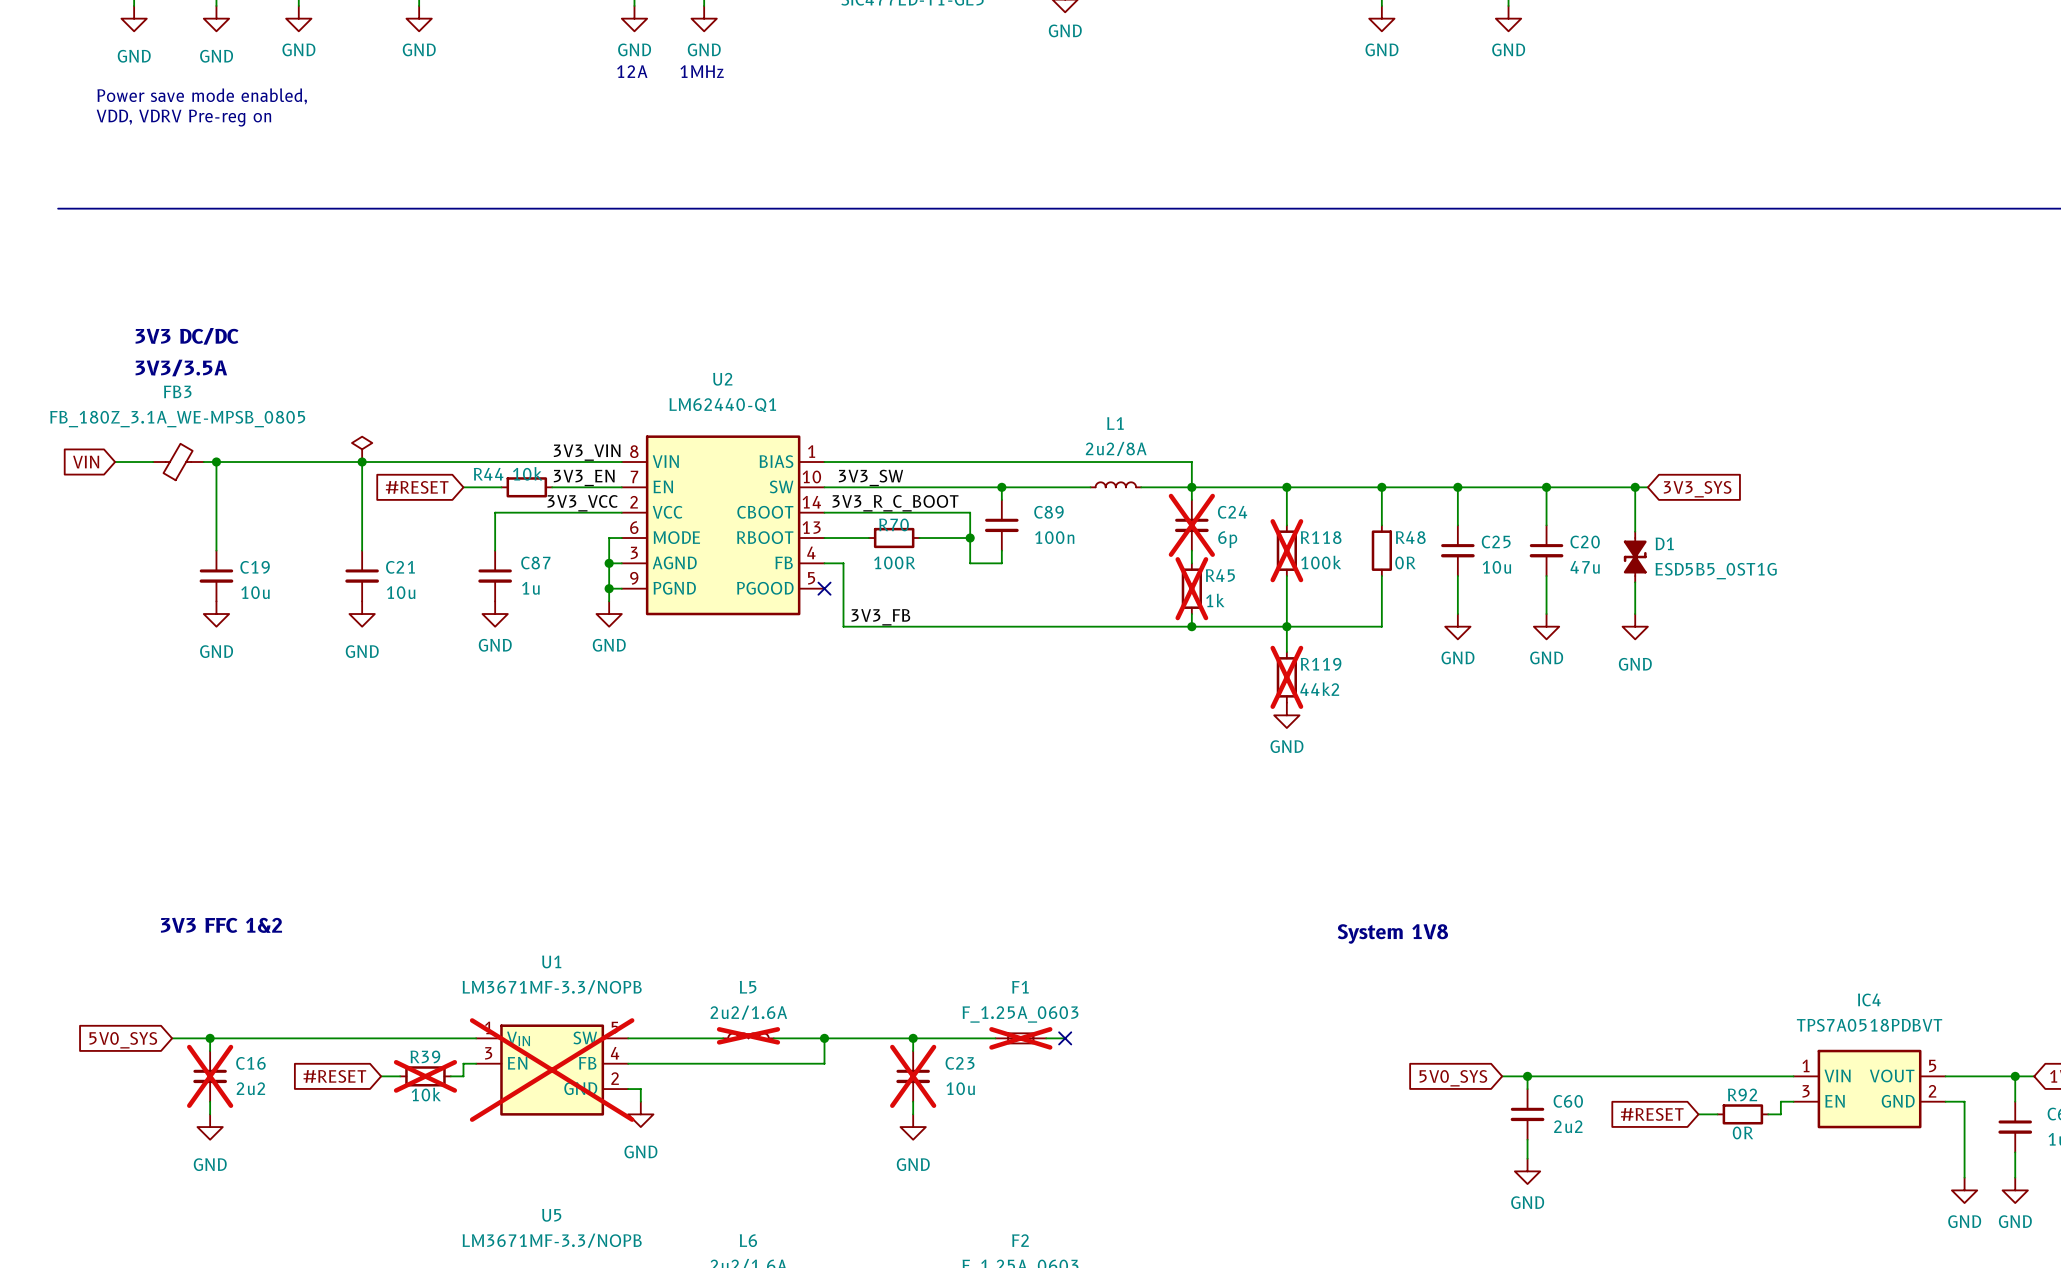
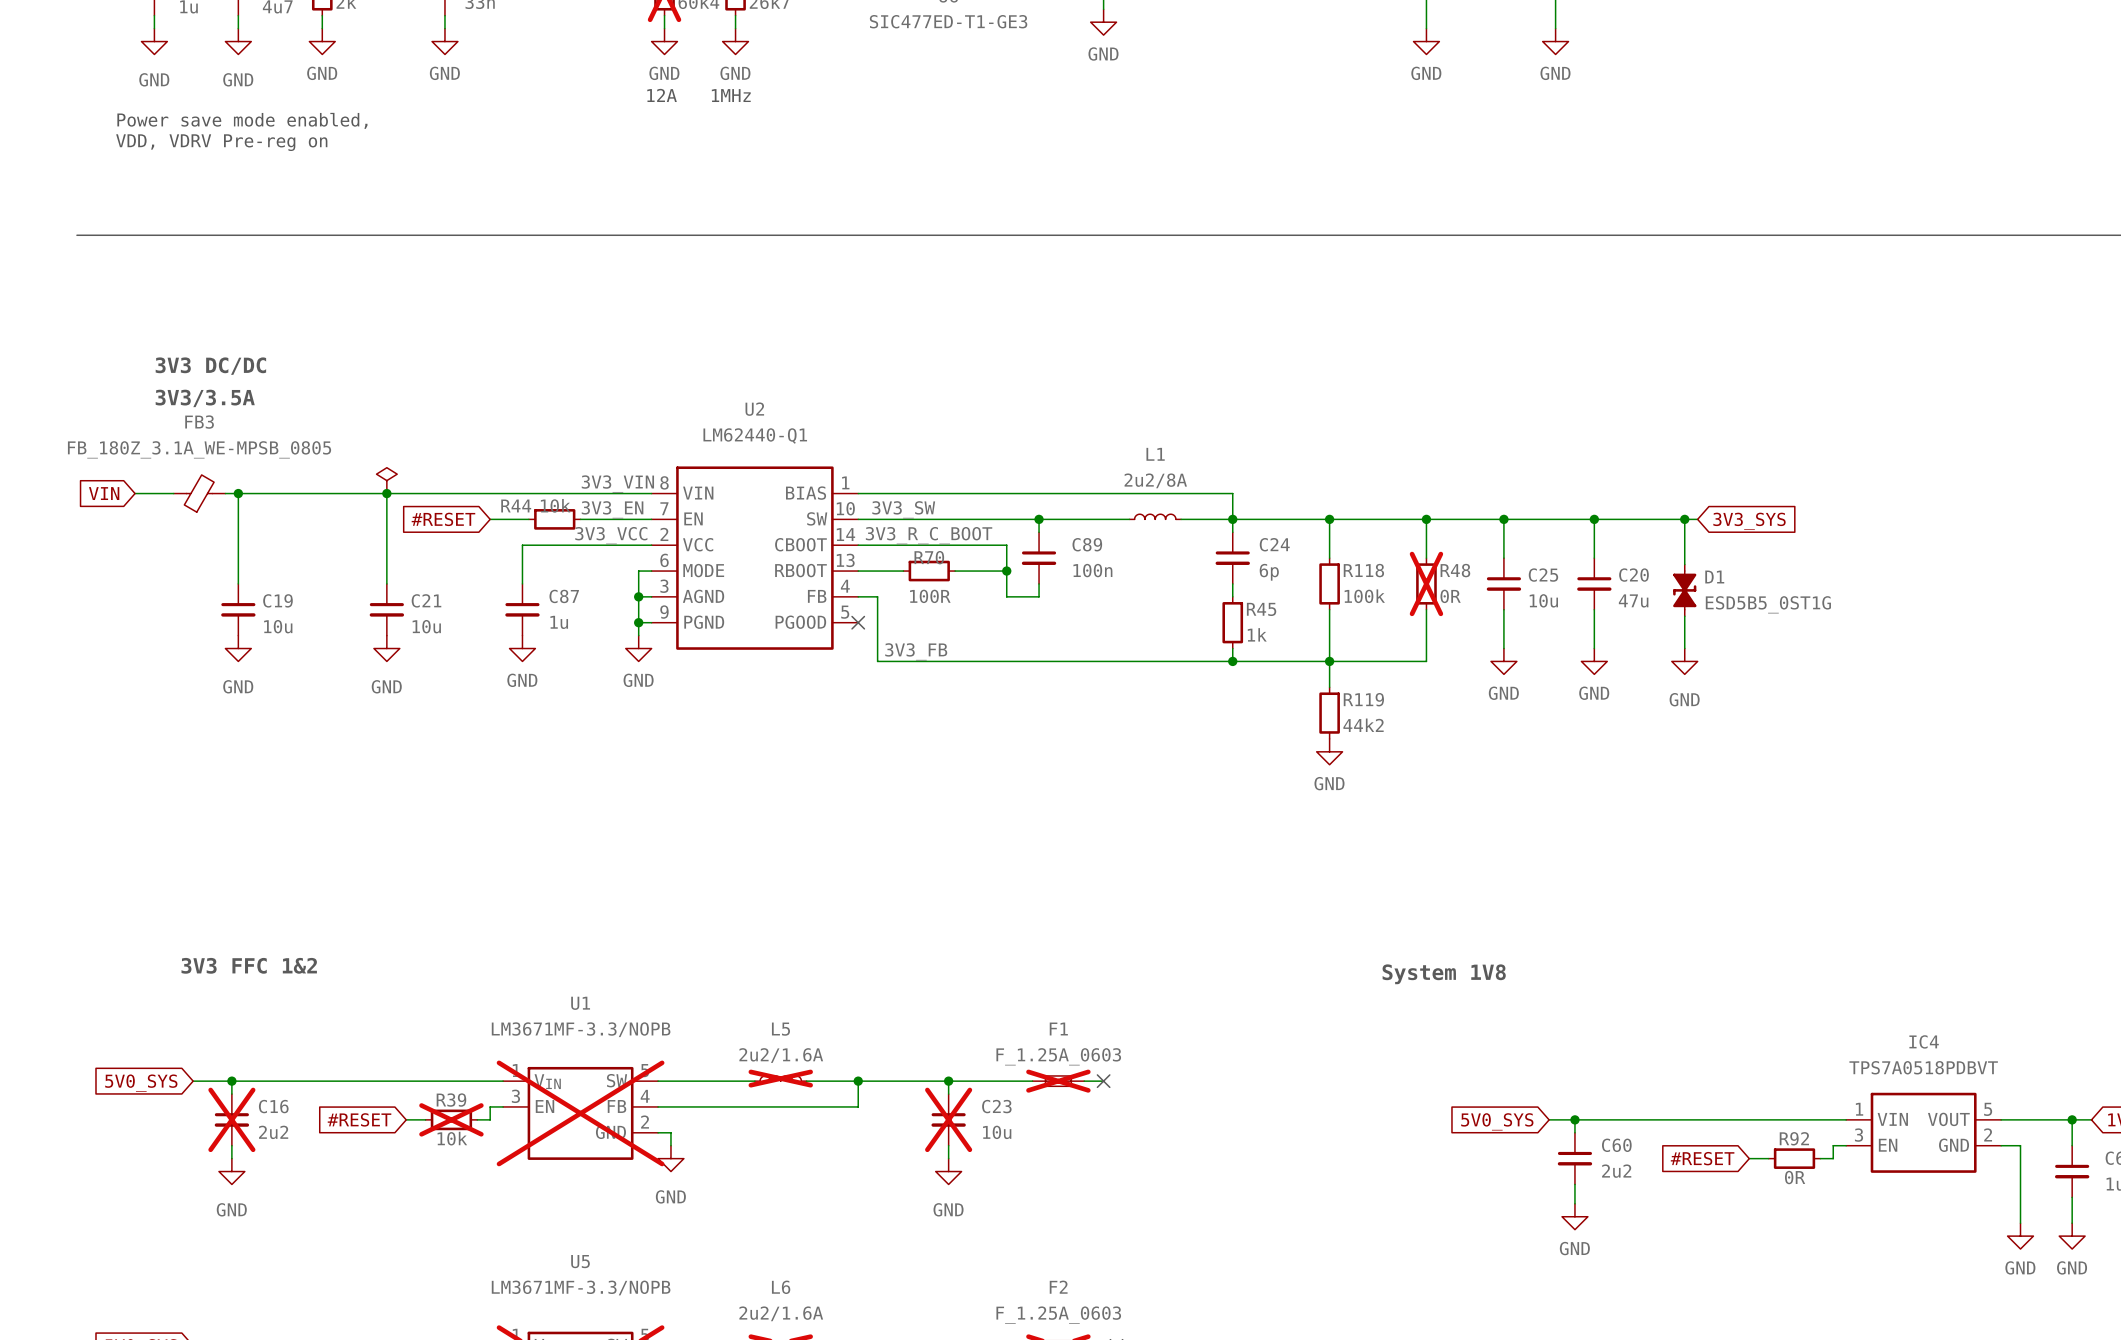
C24 do-not-place cross: (1191, 525) -> none
R118 do-not-place cross: (1286, 550) -> none
R48 do-not-place cross: none -> (1426, 583)
R45 do-not-place cross: (1191, 588) -> none
R119 do-not-place cross: (1286, 677) -> none

